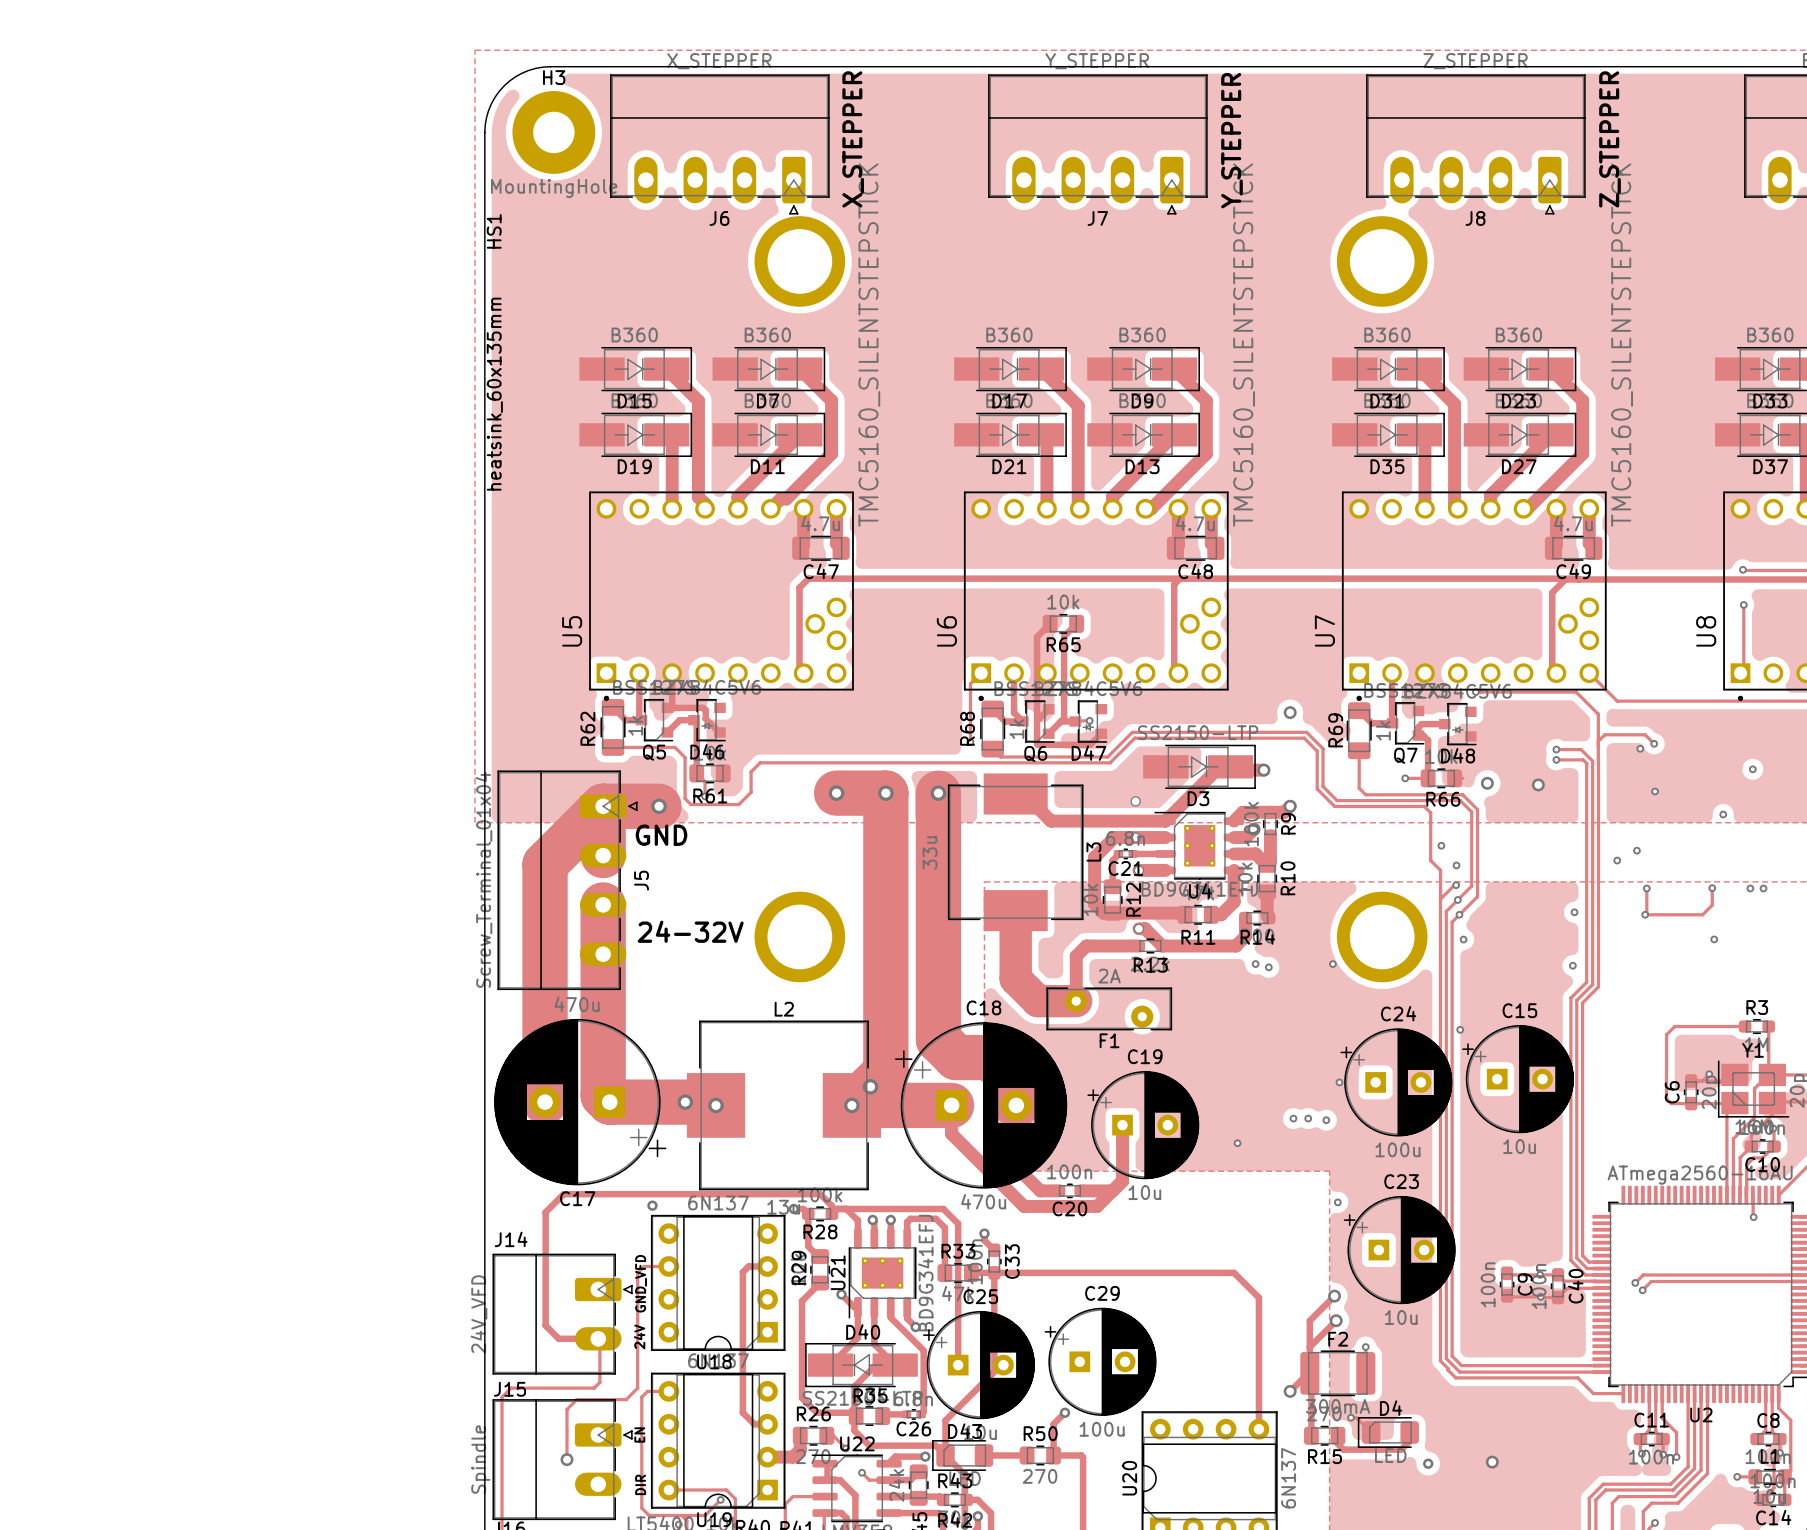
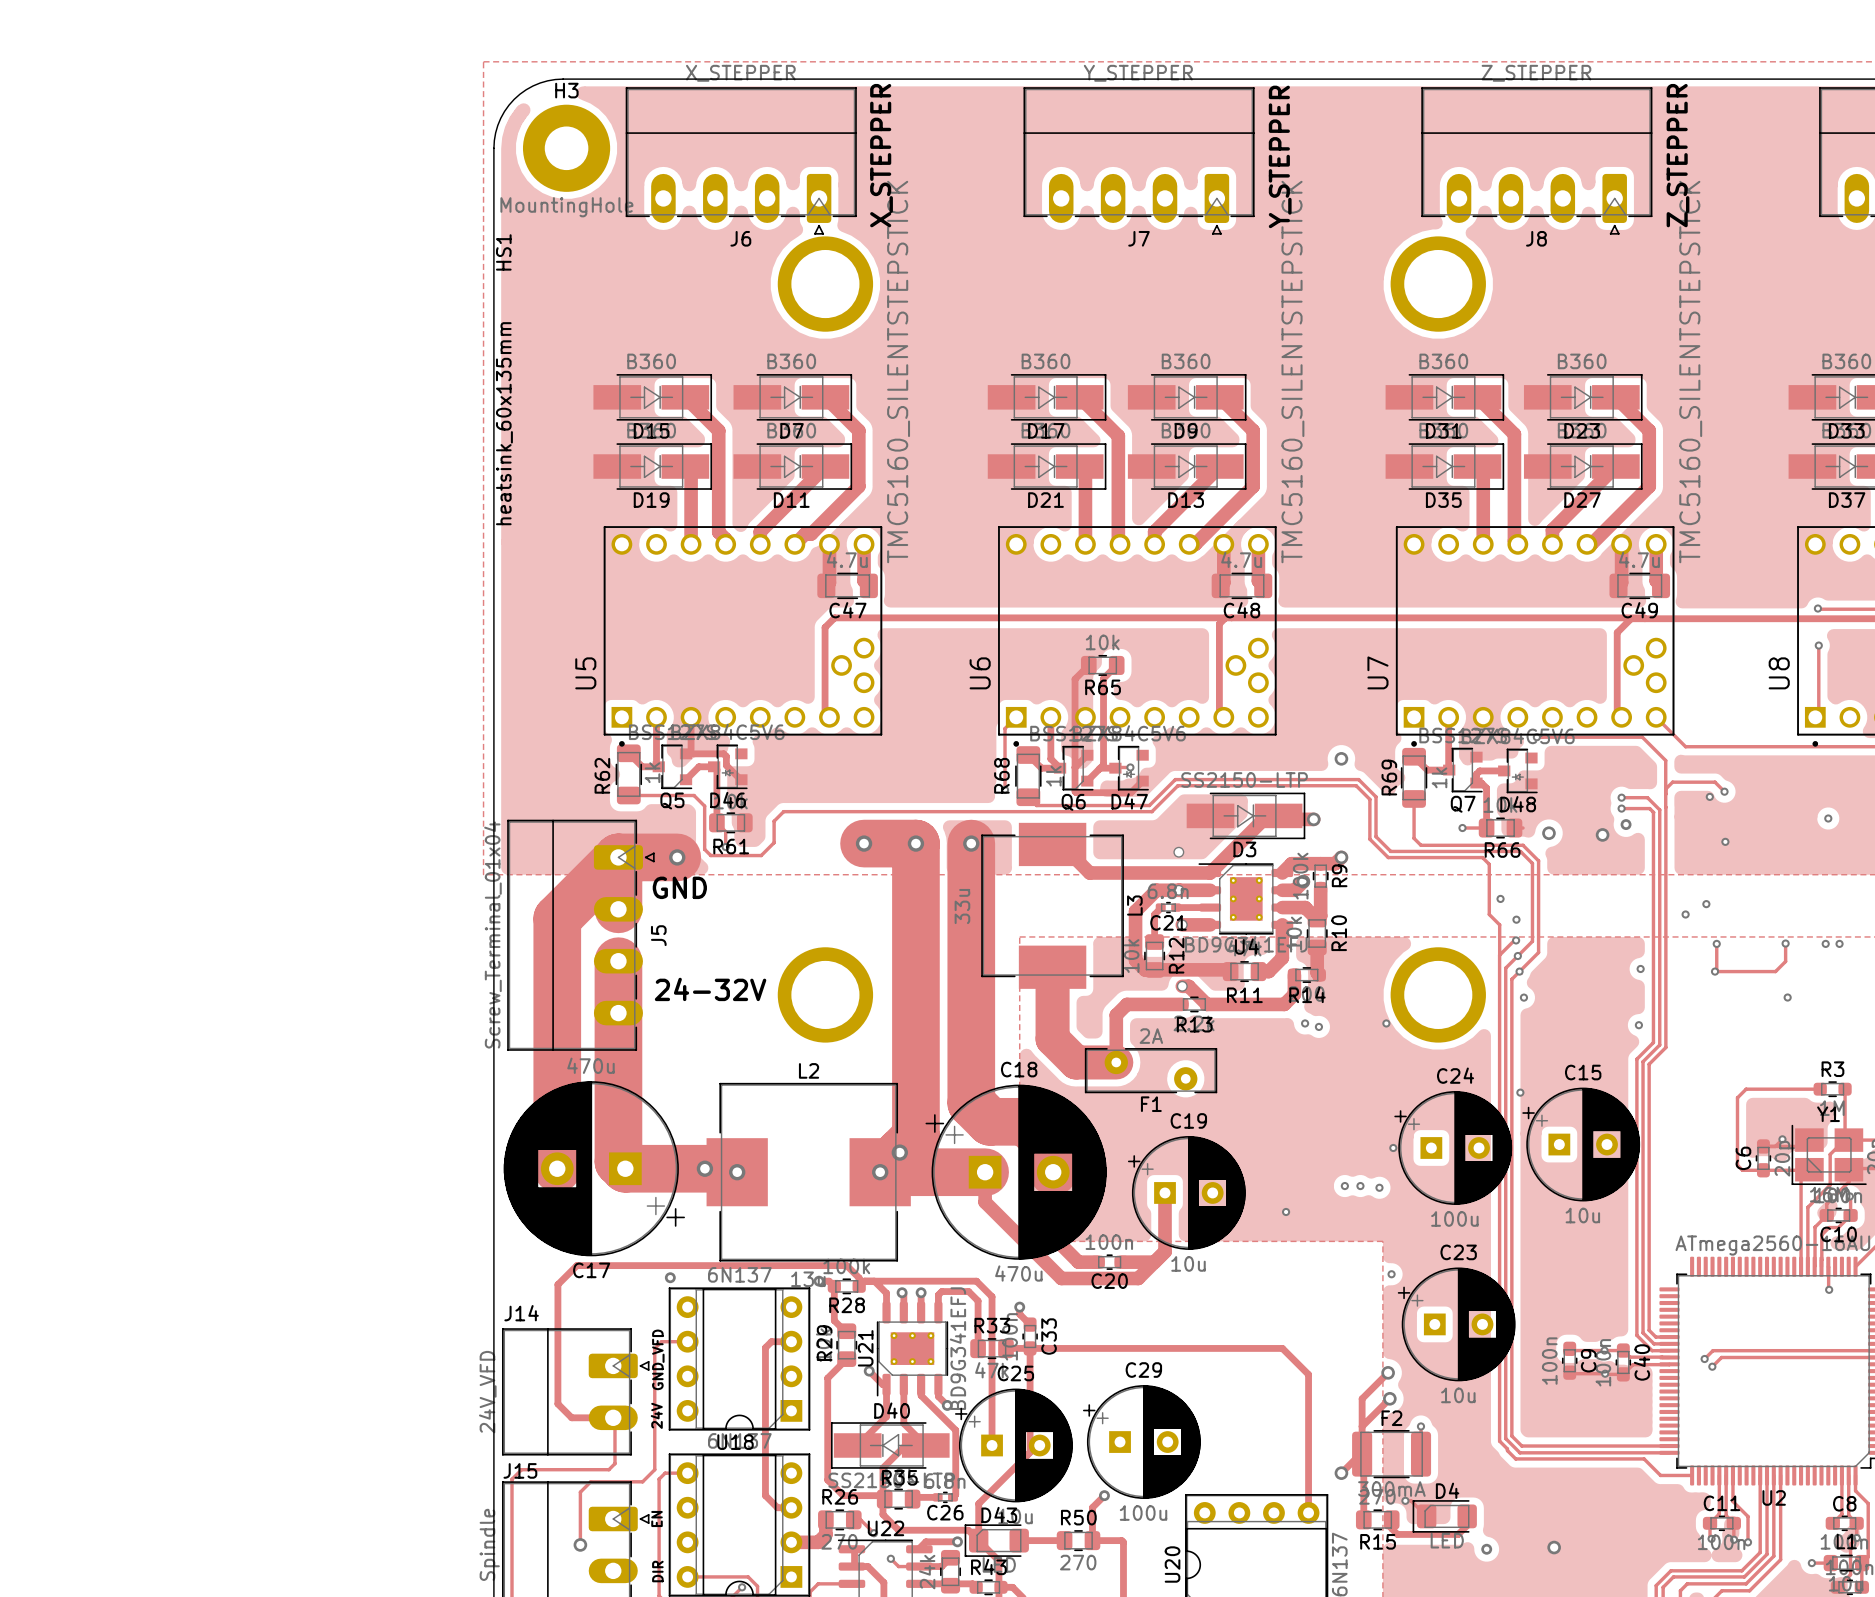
via: none -> (1626, 824)
via: (1723, 814) -> none

